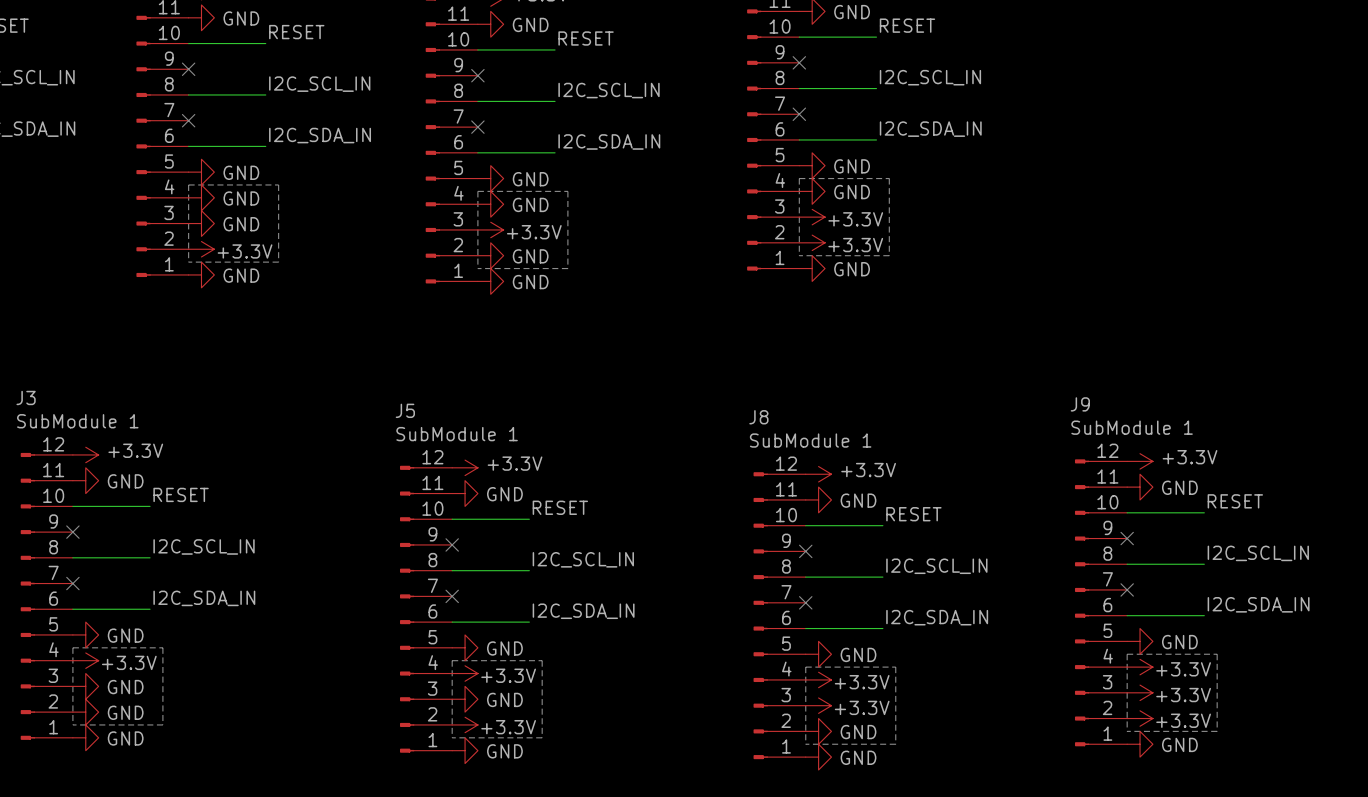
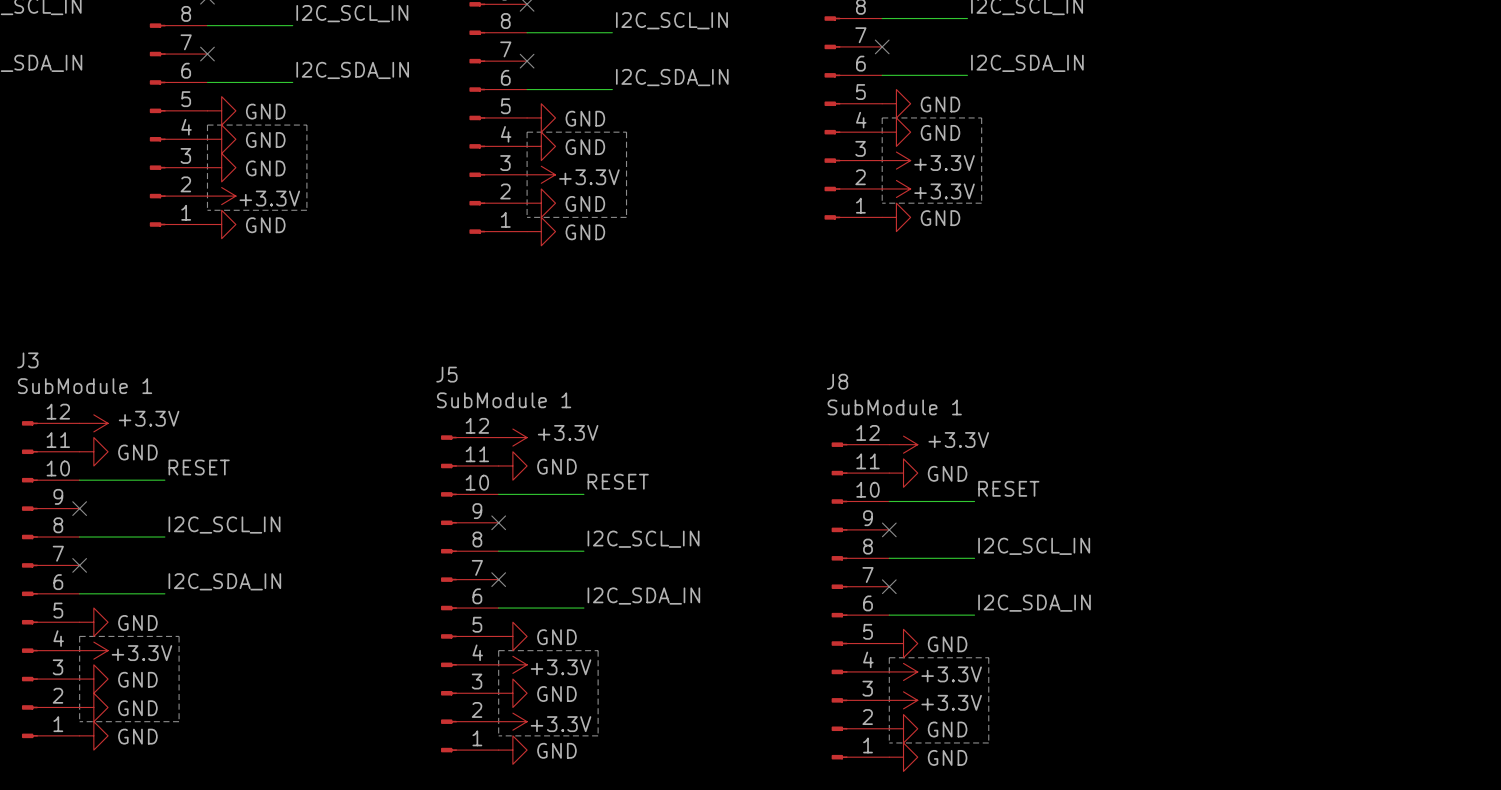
power symbol: +3.3V (1140, 461) -> none
power symbol: GND (1140, 487) -> none
label: RESET (1235, 501) -> none
wire: (1127, 512) (1204, 512) -> none
no-connect mark: (1127, 538) -> none
label: I2C_SCL_IN (1258, 553) -> none
wire: (1127, 564) (1204, 564) -> none
no-connect mark: (1127, 589) -> none
J9: SubModule 1 (1101, 602) -> none
label: I2C_SDA_IN (1258, 604) -> none
wire: (1127, 615) (1204, 615) -> none
power symbol: GND (1140, 641) -> none
line: (1127, 654) (1127, 731) (1217, 731) (1217, 654) (1127, 654) -> none
power symbol: +3.3V (1140, 667) -> none
power symbol: +3.3V (1140, 692) -> none
power symbol: +3.3V (1140, 718) -> none
power symbol: GND (1140, 744) -> none

